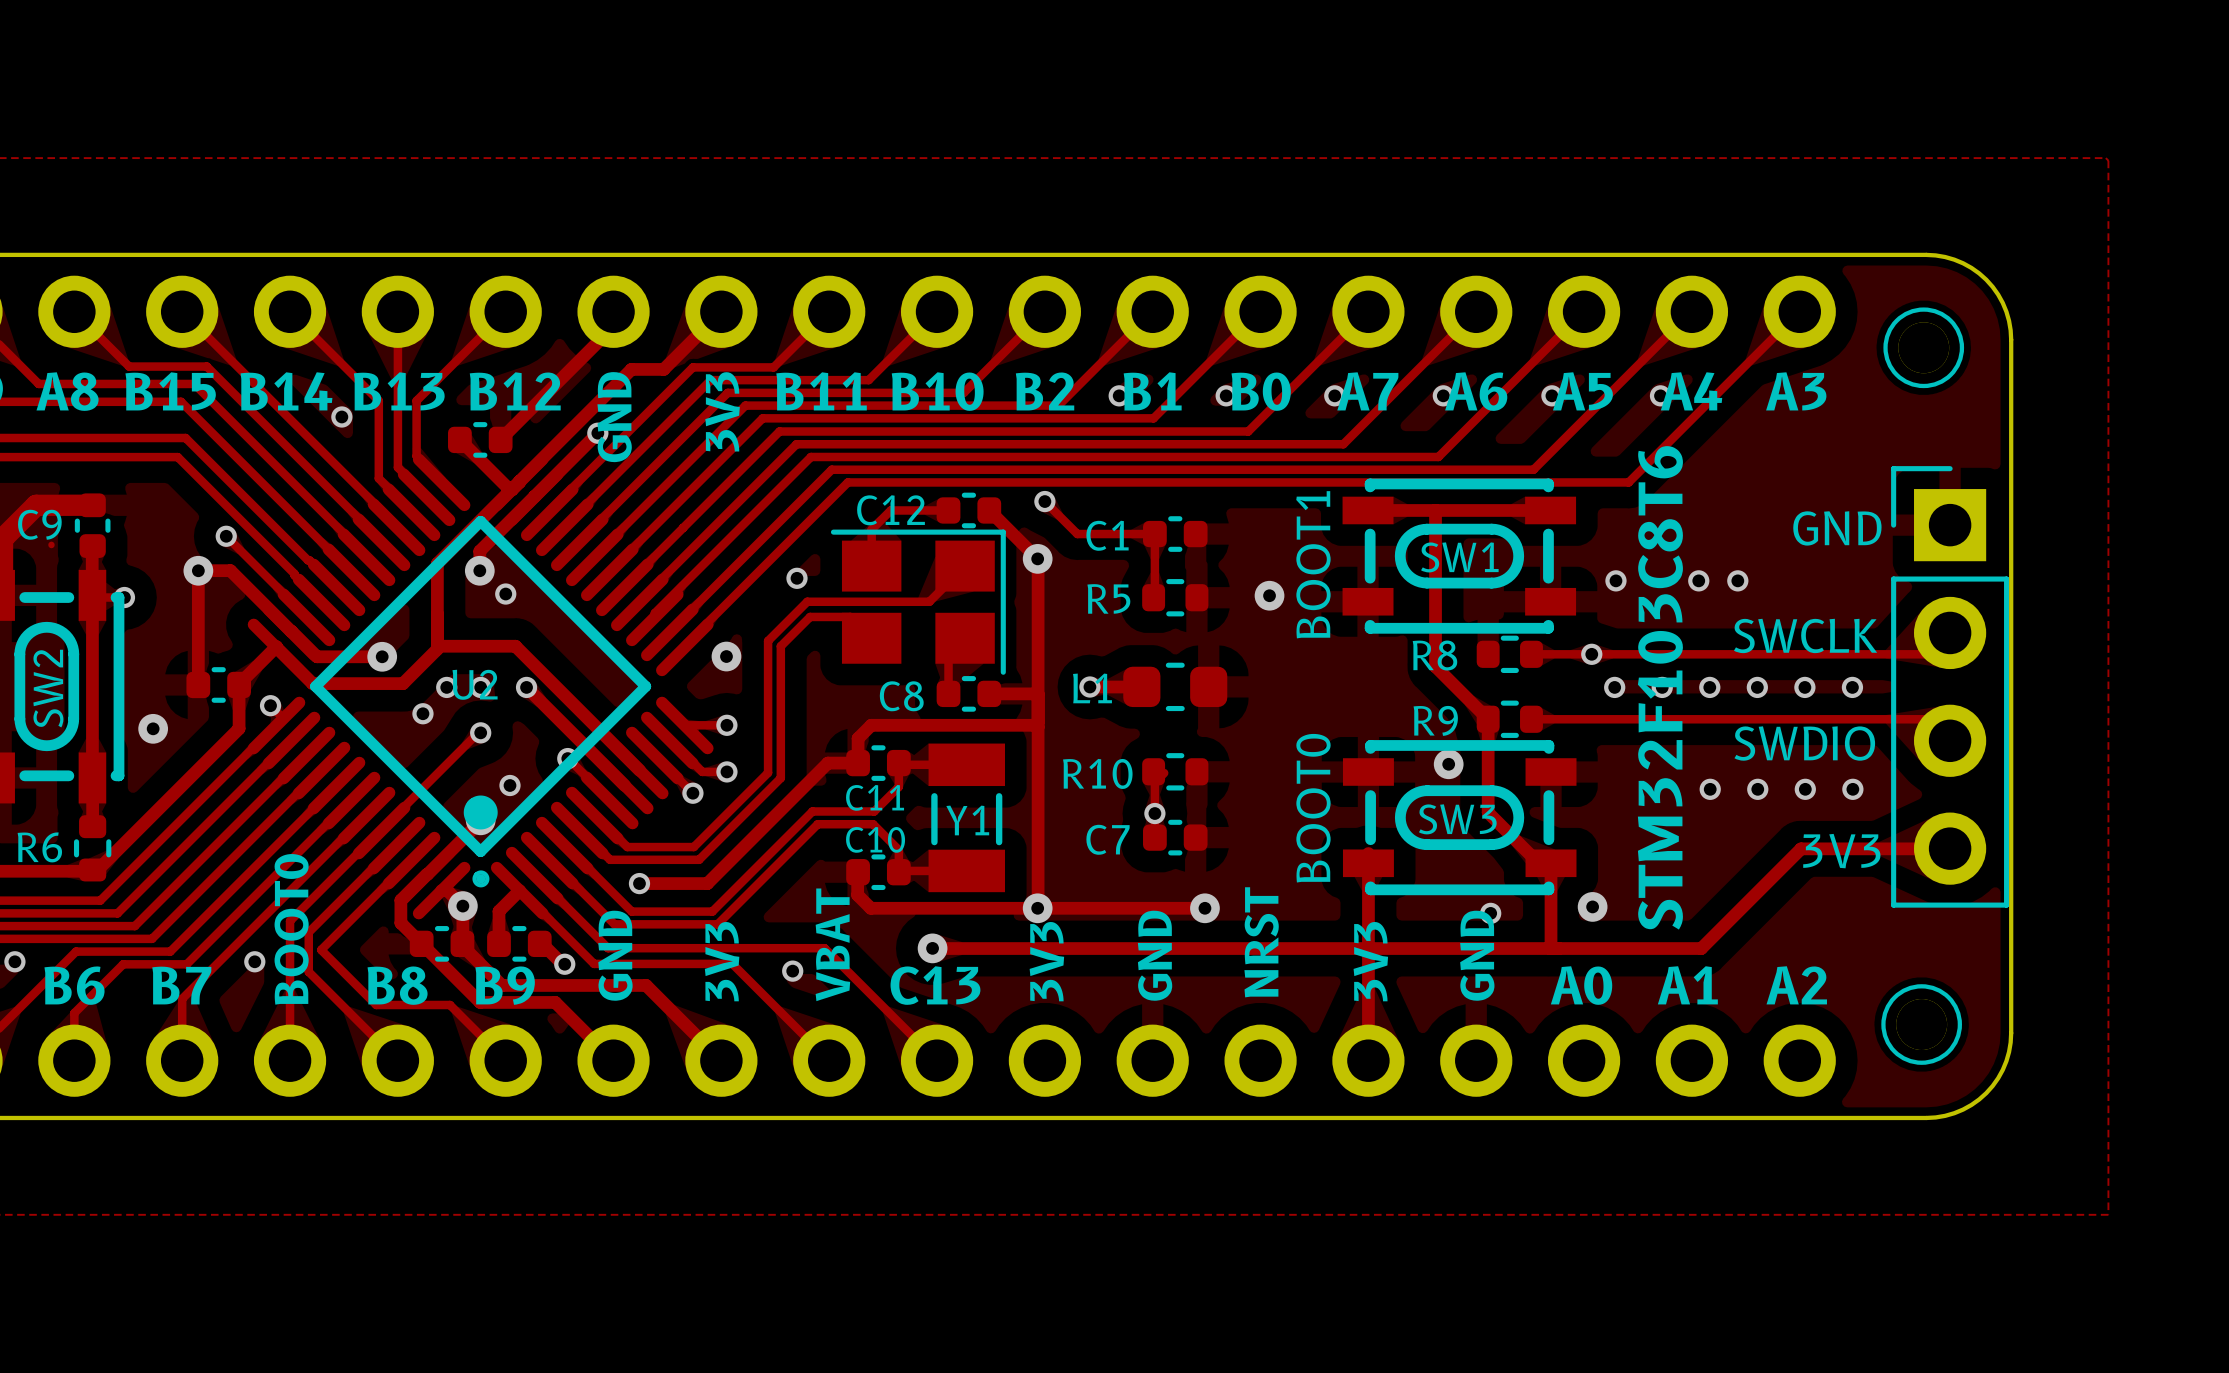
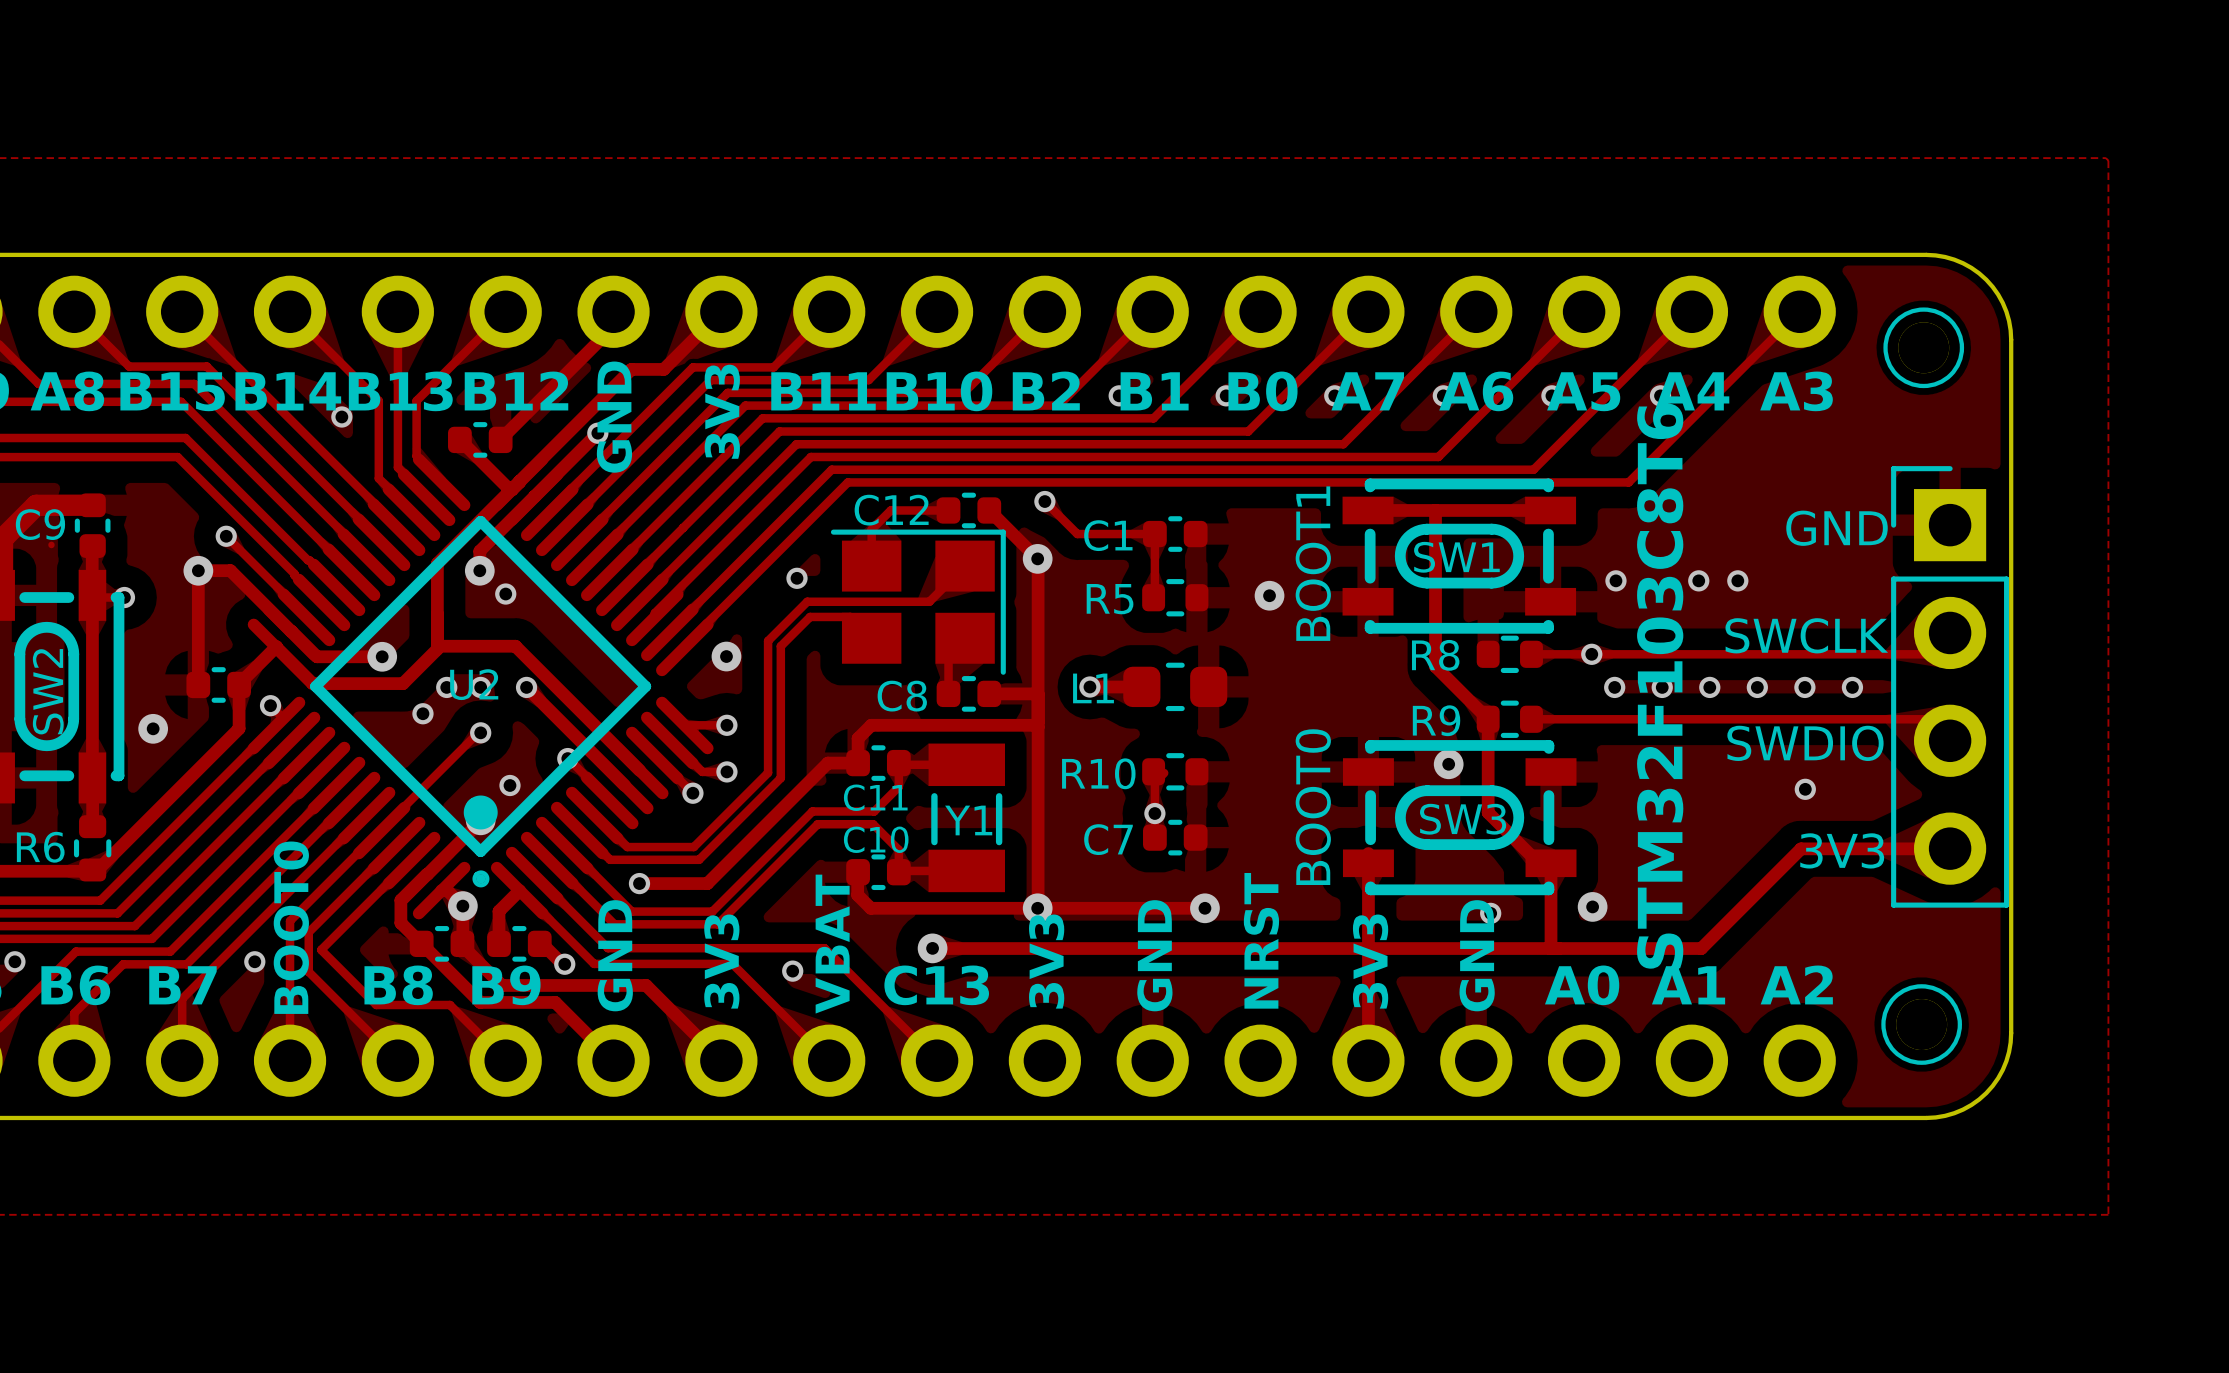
via: (1710, 789) -> none
via: (1757, 789) -> none
via: (1852, 789) -> none

